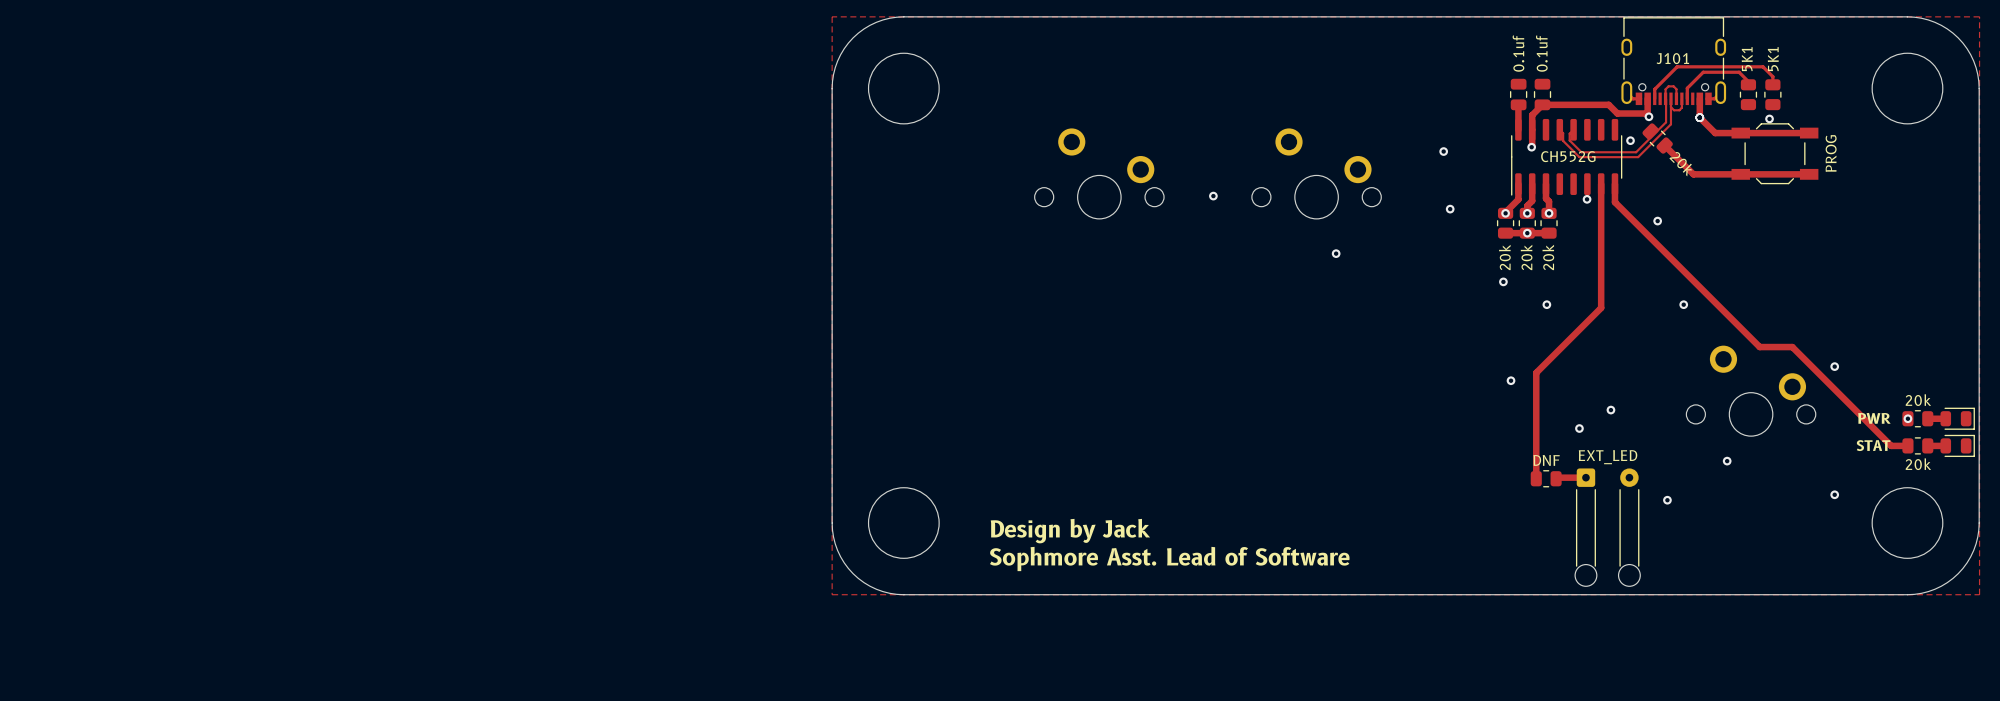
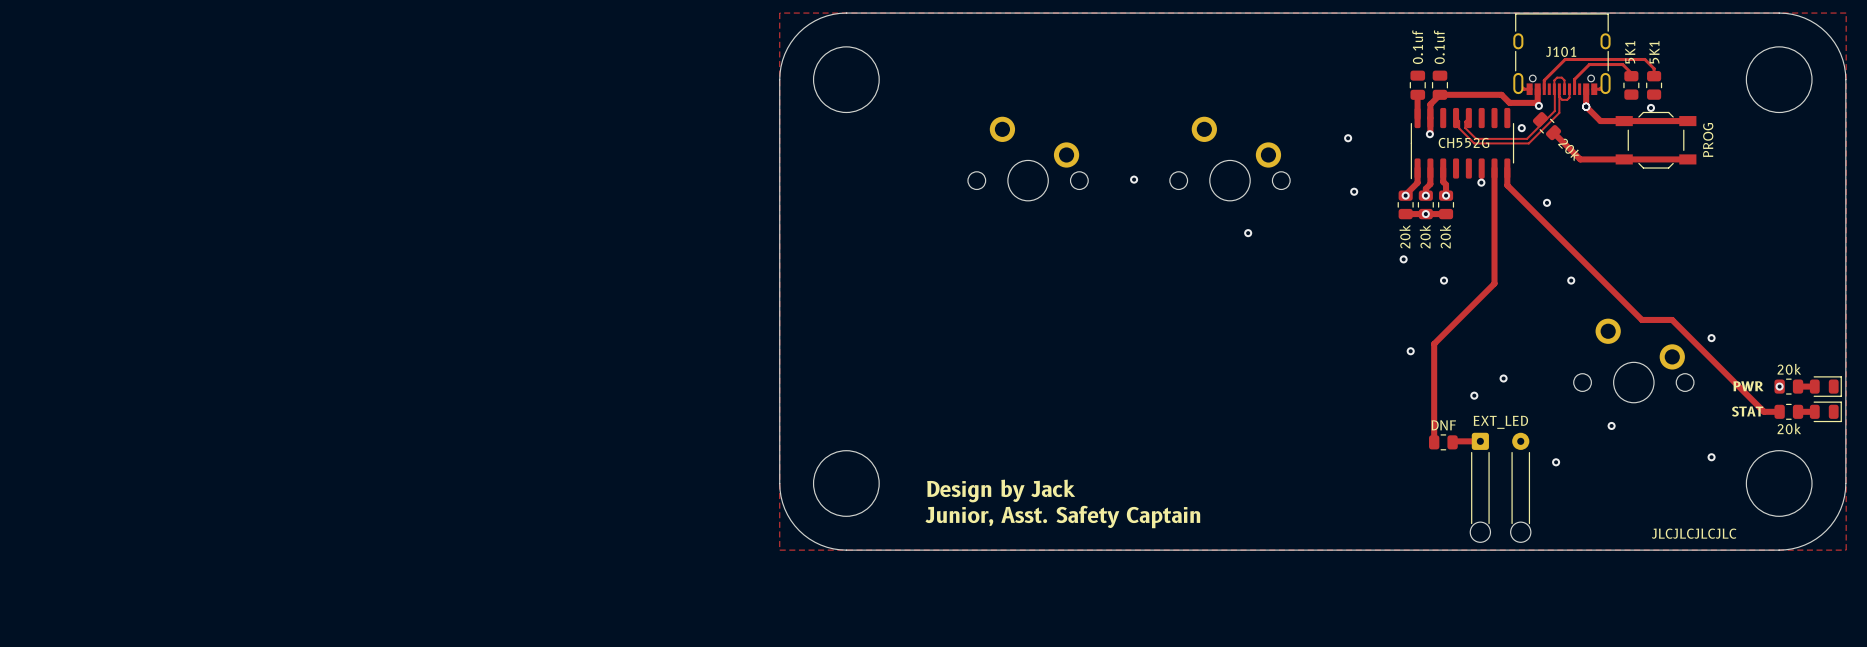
text: Sophmore Asst. Lead of Software (1169, 558) -> Junior, Asst. Safety Captain (1062, 517)
text: none -> JLCJLCJLCJLC (1694, 533)

